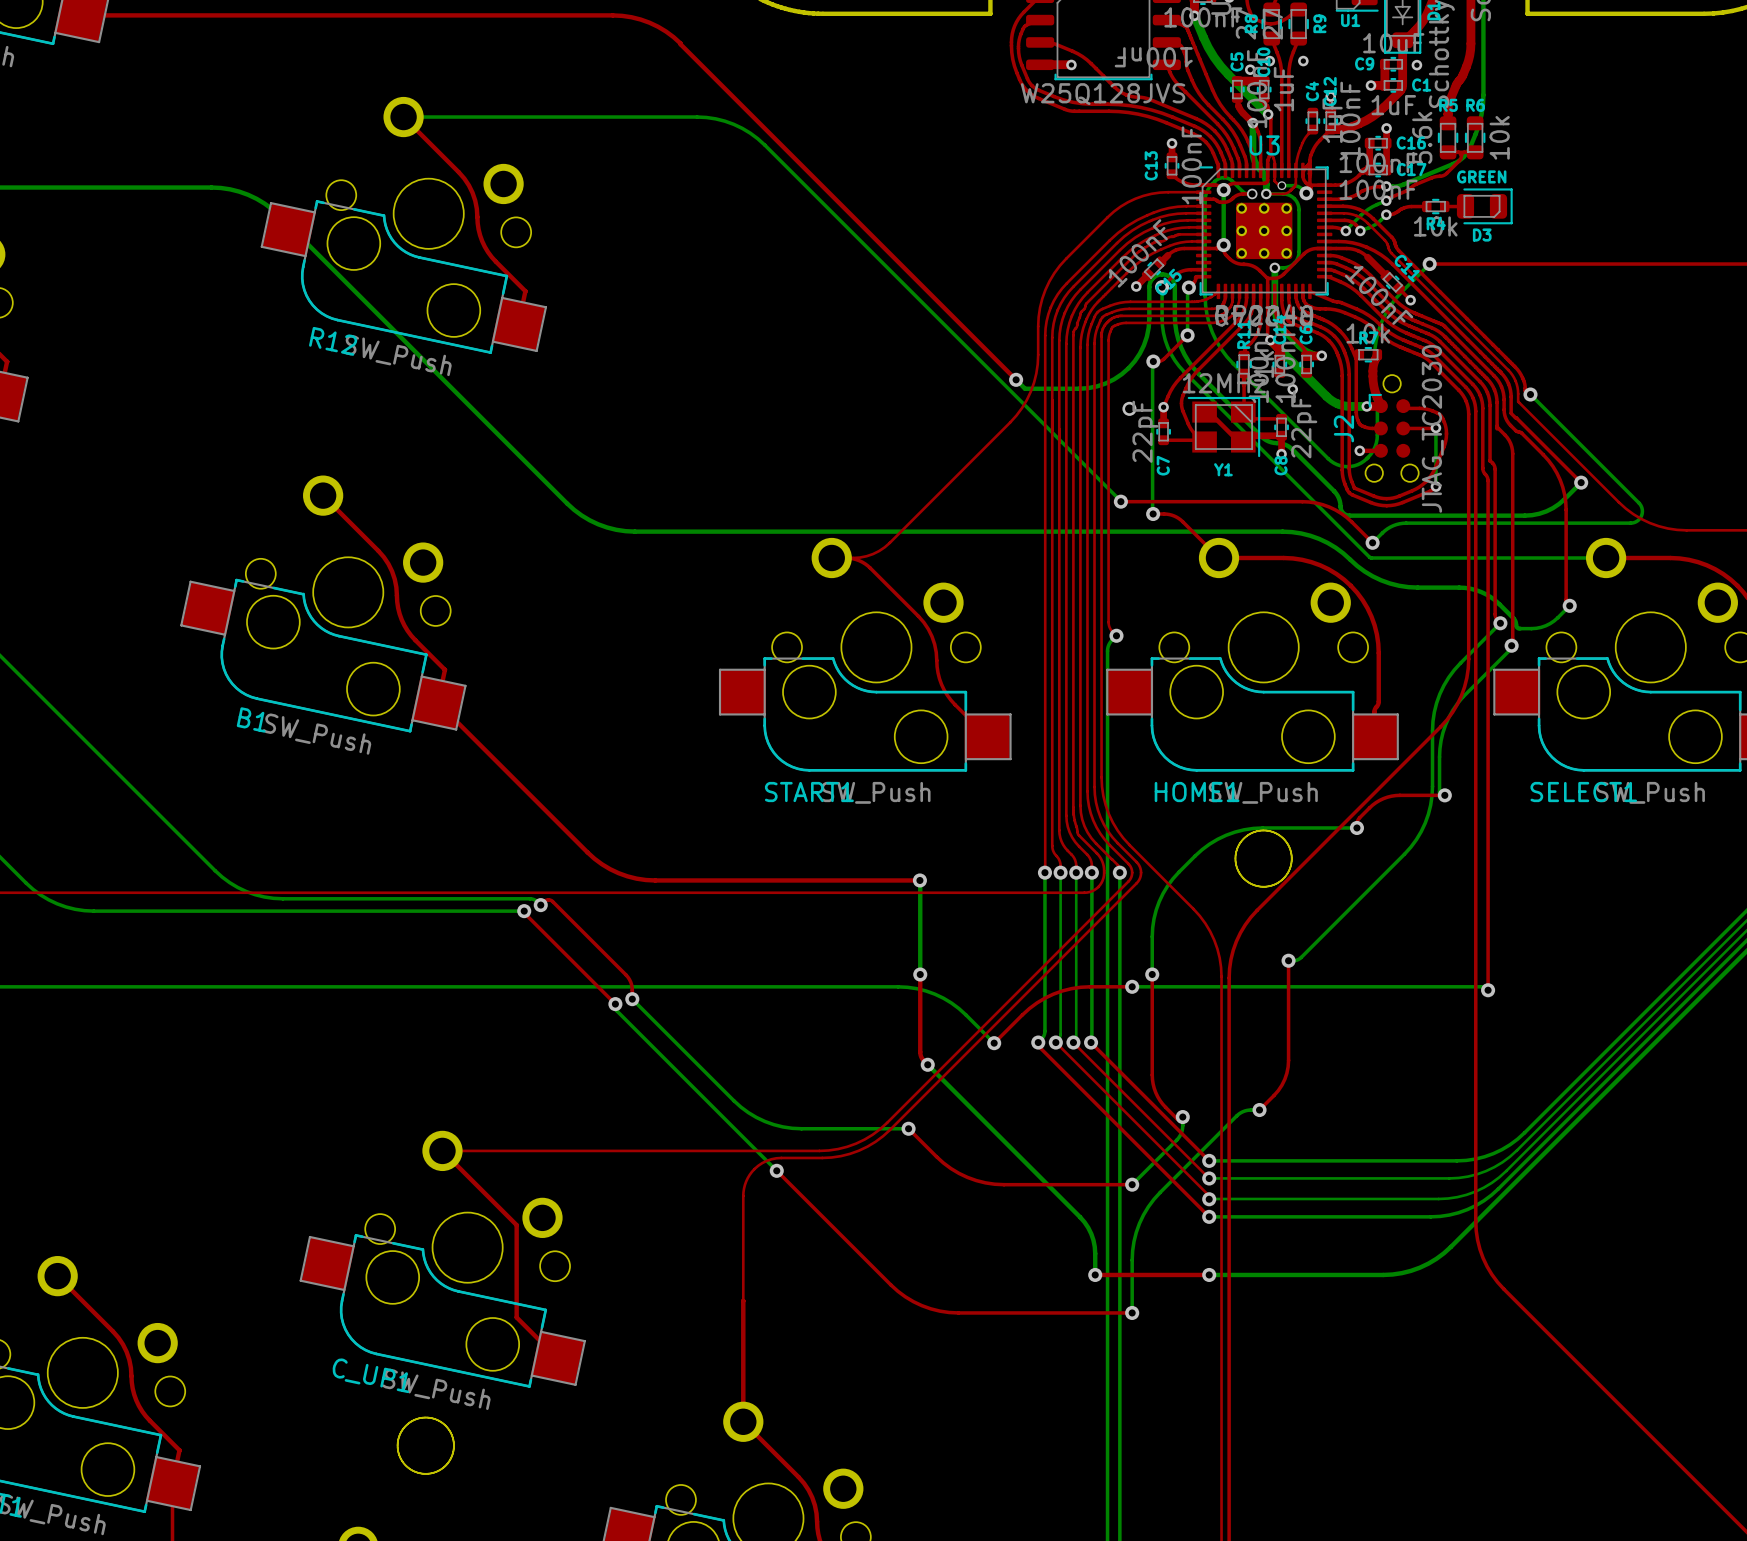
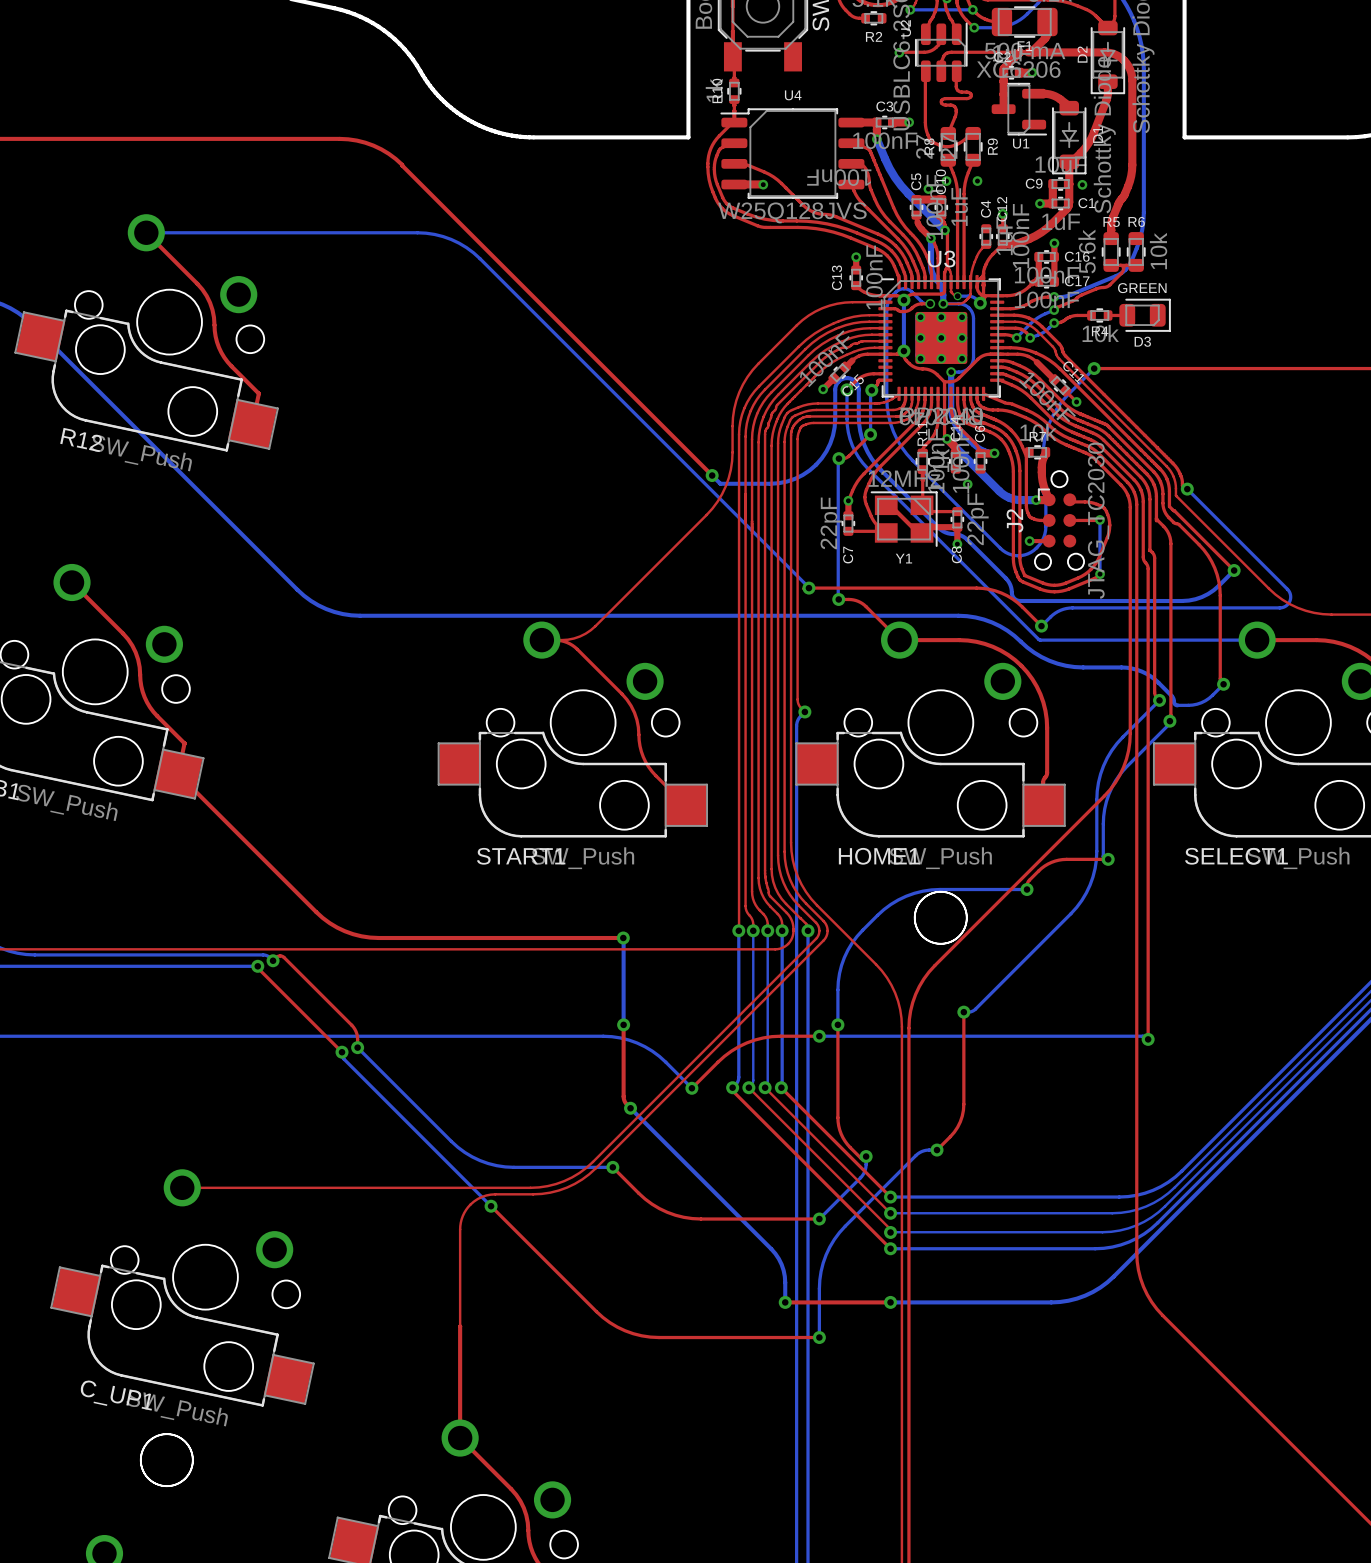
via: (1129, 408) -> none
top track: (442, 1150) (516, 1225) (516, 1317) (557, 1358) -> none

